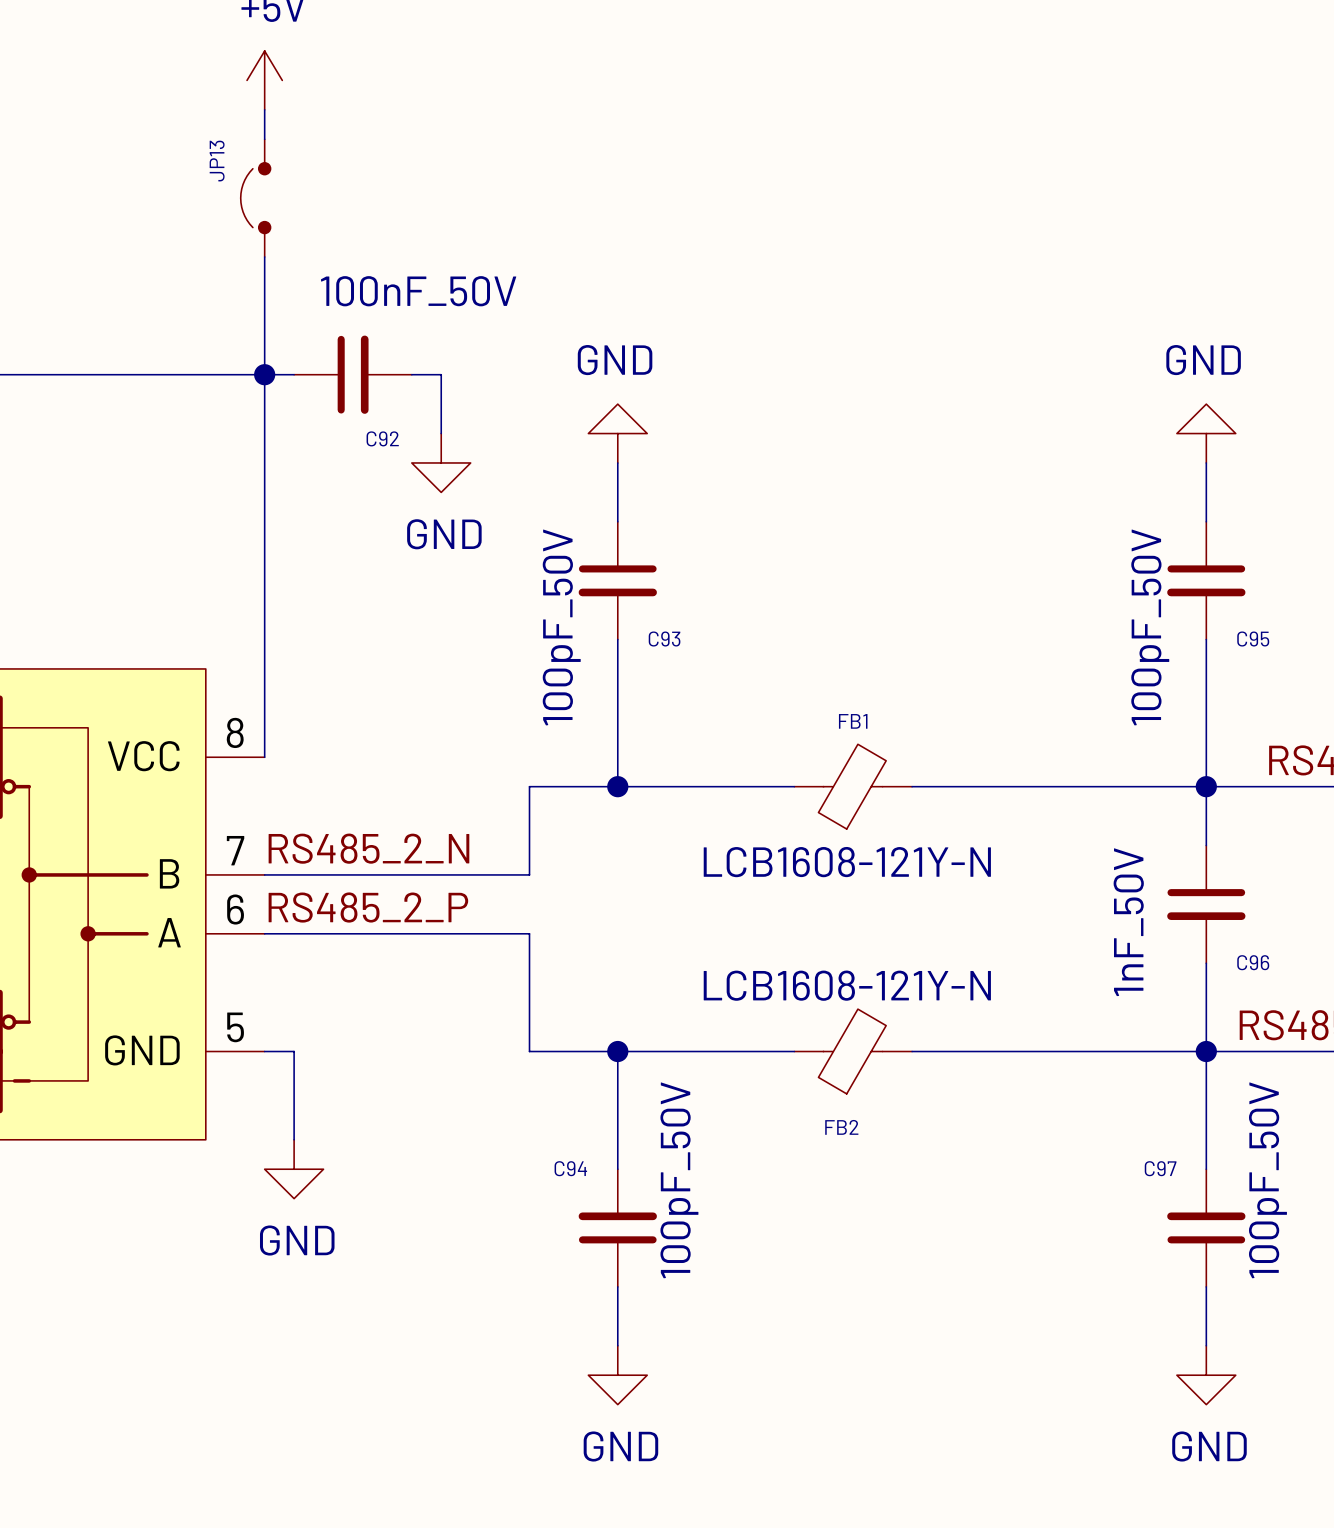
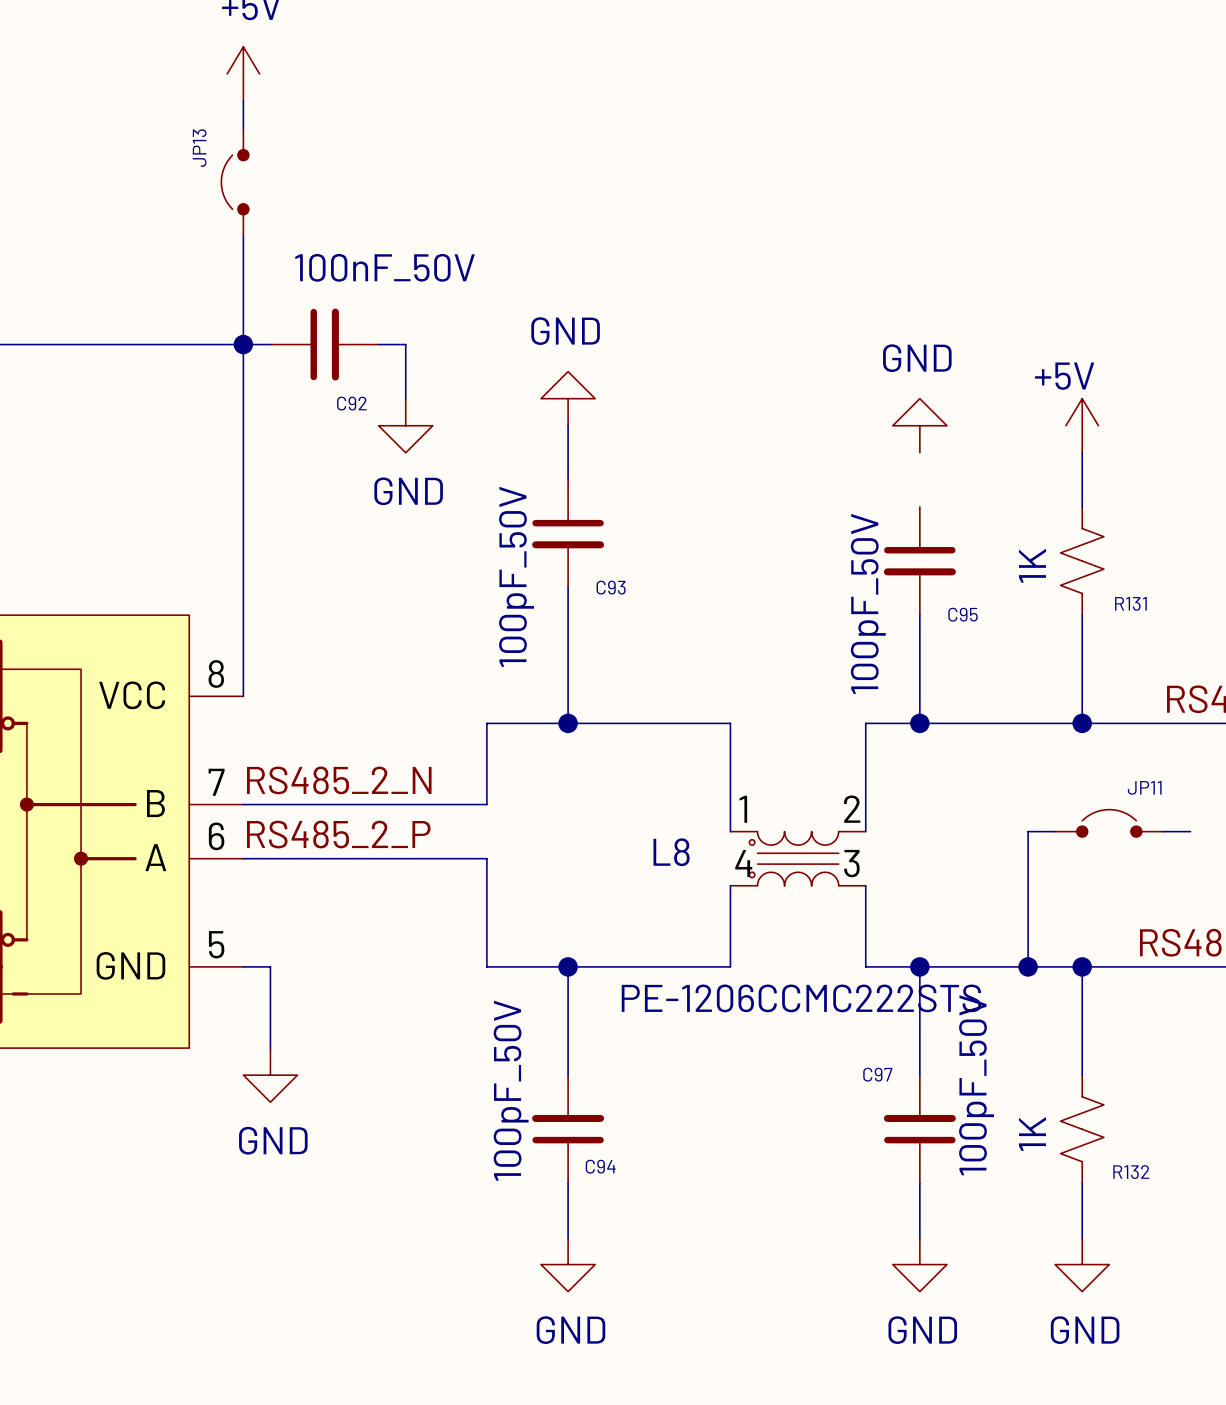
power symbol position: GND (1206, 433) -> GND (919, 425)
power symbol: none -> +5V (1082, 425)
wire: (1206, 462) (1206, 521) -> (1082, 452) (1082, 506)
C95 position: (1206, 580) -> (919, 561)
R131: none -> 1K (1082, 561)
wire: (1206, 639) (1206, 845) -> none
wire: none -> (919, 615) (919, 723)
wire: none -> (1082, 615) (1082, 723)
wire: none -> (730, 723) (730, 831)
FB1: LCB1608-121Y-N (853, 786) -> none
wire: (912, 786) (941, 786) -> (865, 831) (865, 723)
junction: none -> (919, 723)
junction position: (1206, 786) -> (1082, 723)
JP11: none -> (1109, 823)
wire: none -> (1055, 831) (1028, 831) (1028, 966)
C96: 1nF_50V (1206, 904) -> none
wire: none -> (1163, 831) (1190, 831)
L8: none -> PE-1206CCMC222STS (798, 858)
wire: none -> (730, 885) (730, 966)
wire: (1206, 963) (1206, 1169) -> none
FB2: LCB1608-121Y-N (853, 1051) -> none
wire: (912, 1051) (941, 1051) -> (865, 885) (865, 966)
wire: none -> (919, 966) (919, 1075)
junction: none -> (919, 966)
junction: none -> (1028, 966)
wire: none -> (1082, 966) (1082, 1075)
junction position: (1206, 1051) -> (1082, 966)
C94 name position: C94 (570, 1168) -> C94 (600, 1166)
C94 value position: 100pF_50V (679, 1180) -> 100pF_50V (511, 1090)
R132: none -> 1K (1082, 1129)
C97 position: (1206, 1228) -> (919, 1129)
wire: none -> (919, 1183) (919, 1237)
wire: (1206, 1286) (1206, 1345) -> (1082, 1183) (1082, 1237)
power symbol: none -> GND (919, 1264)
power symbol position: GND (1206, 1375) -> GND (1082, 1264)

